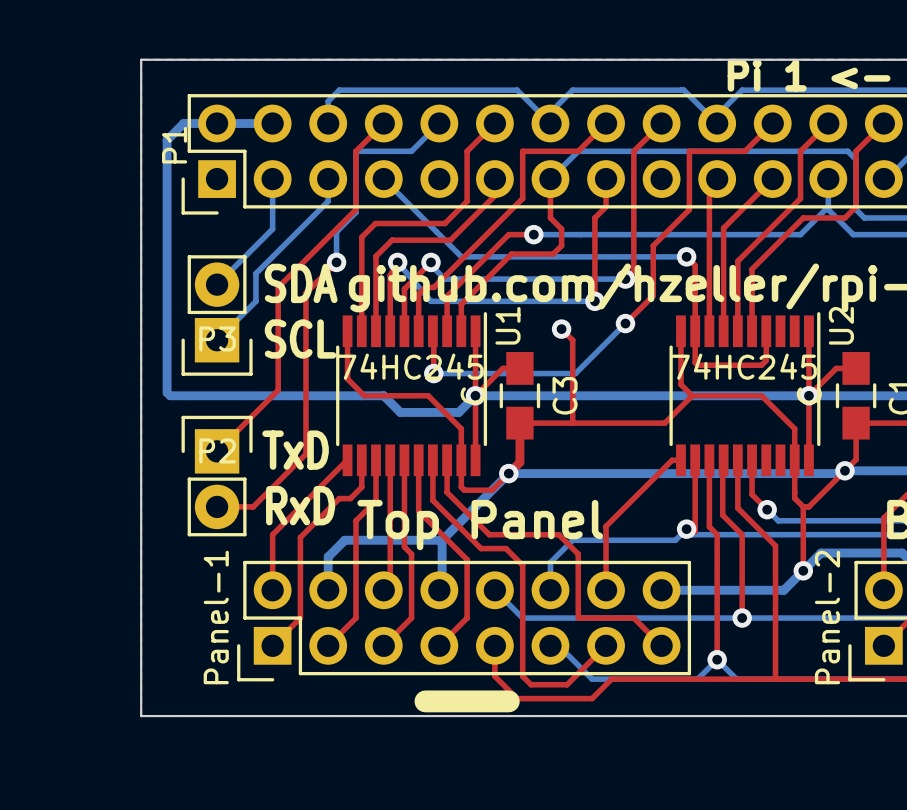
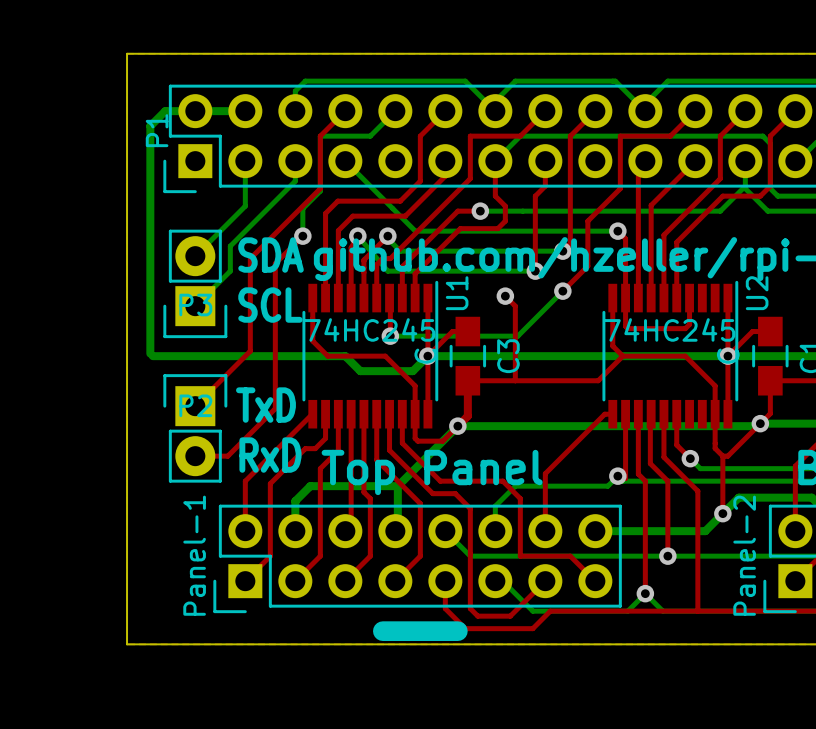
text: Pi 1 <- (809, 75) -> none

